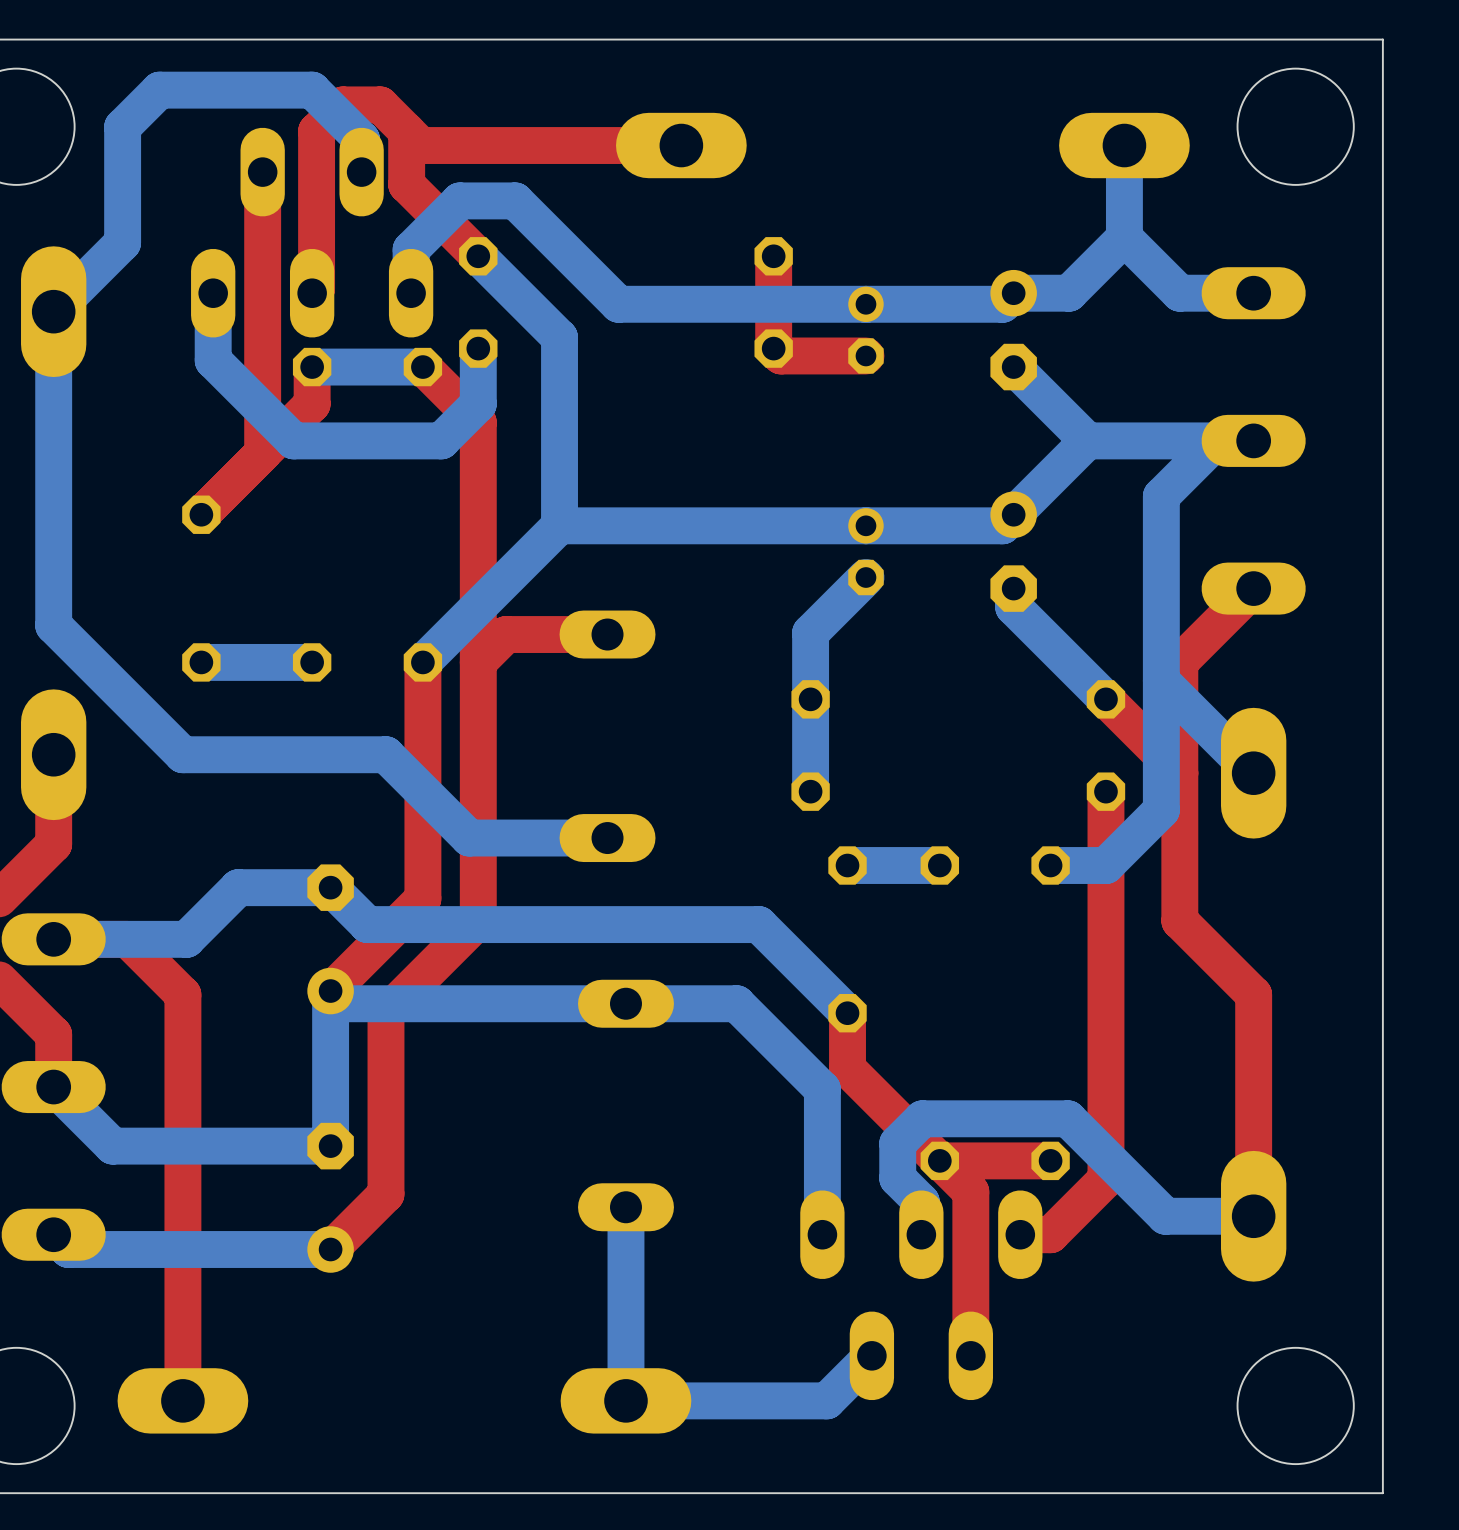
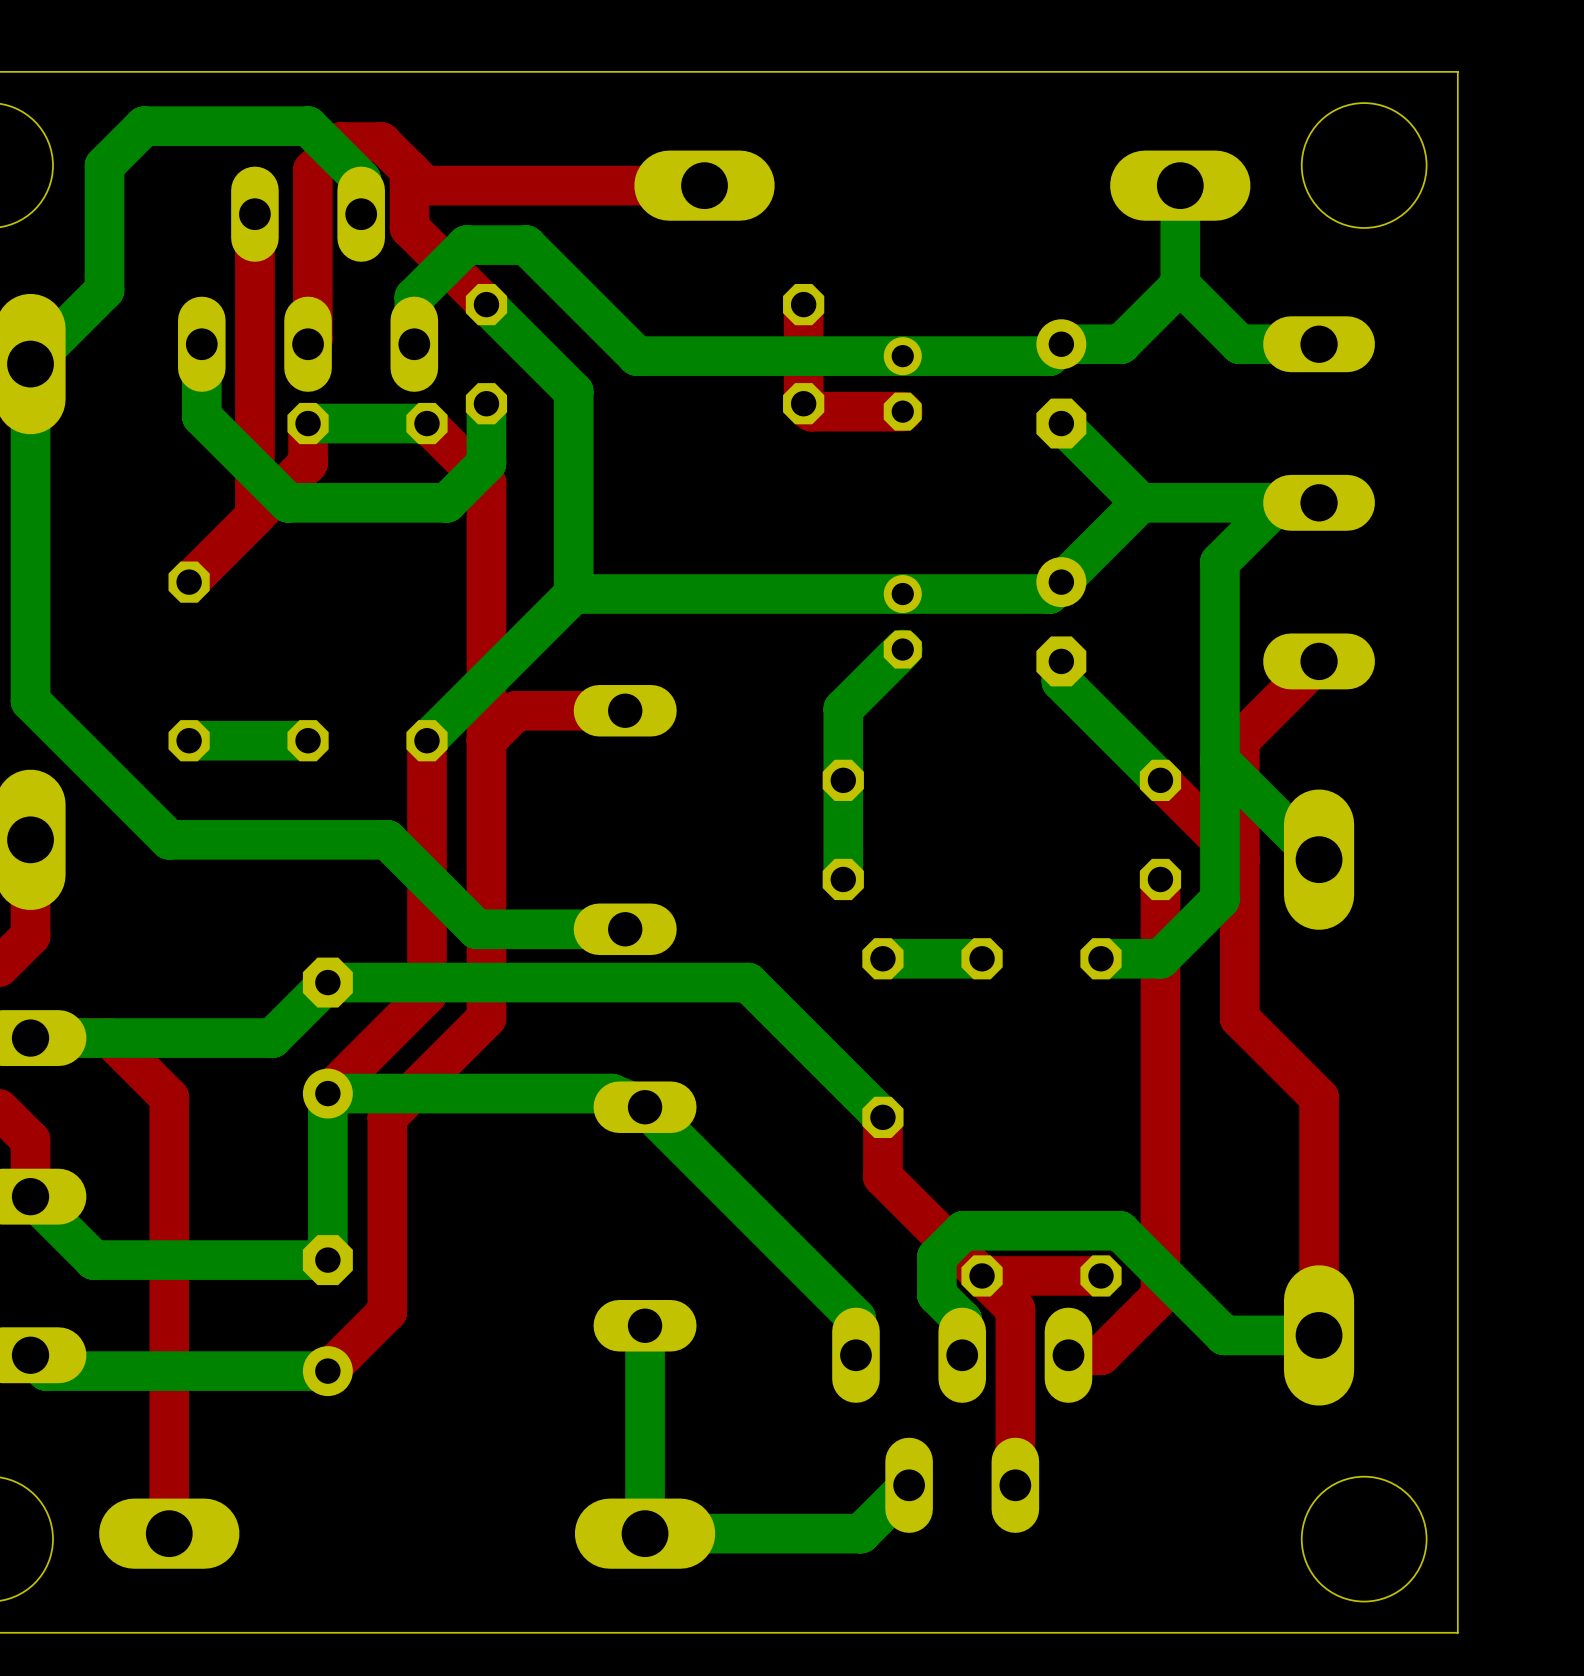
bottom track: (758, 924) (367, 924) (330, 887) (238, 887) (186, 939) -> (787, 1022) (748, 982) (327, 982) (272, 1038) (173, 1038)
bottom track: (330, 991) (343, 1003) (736, 1003) (822, 1089) (822, 1200) -> (327, 1093) (611, 1093) (645, 1107) (855, 1318)

